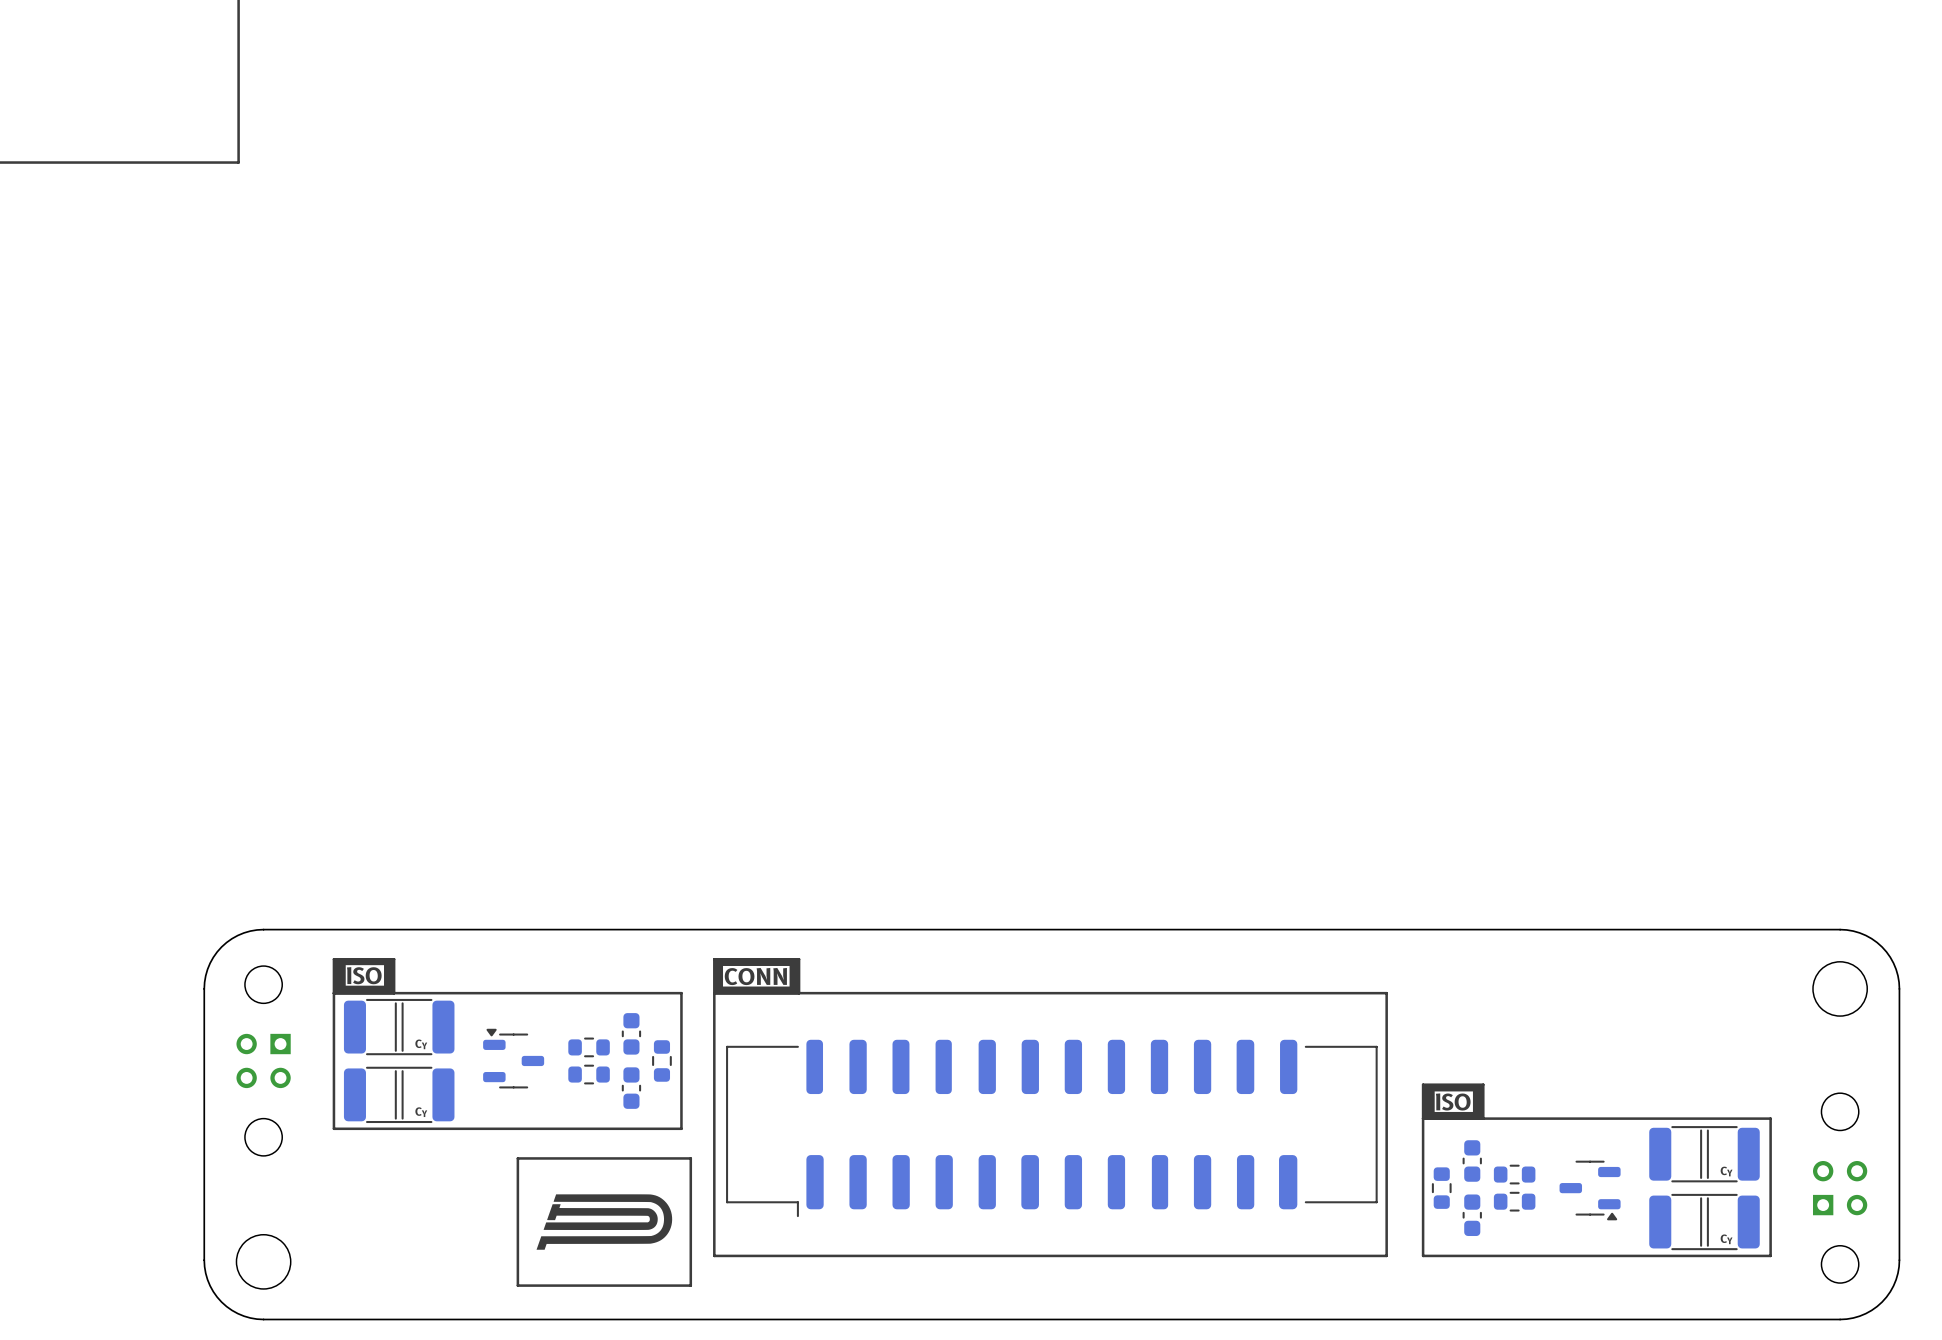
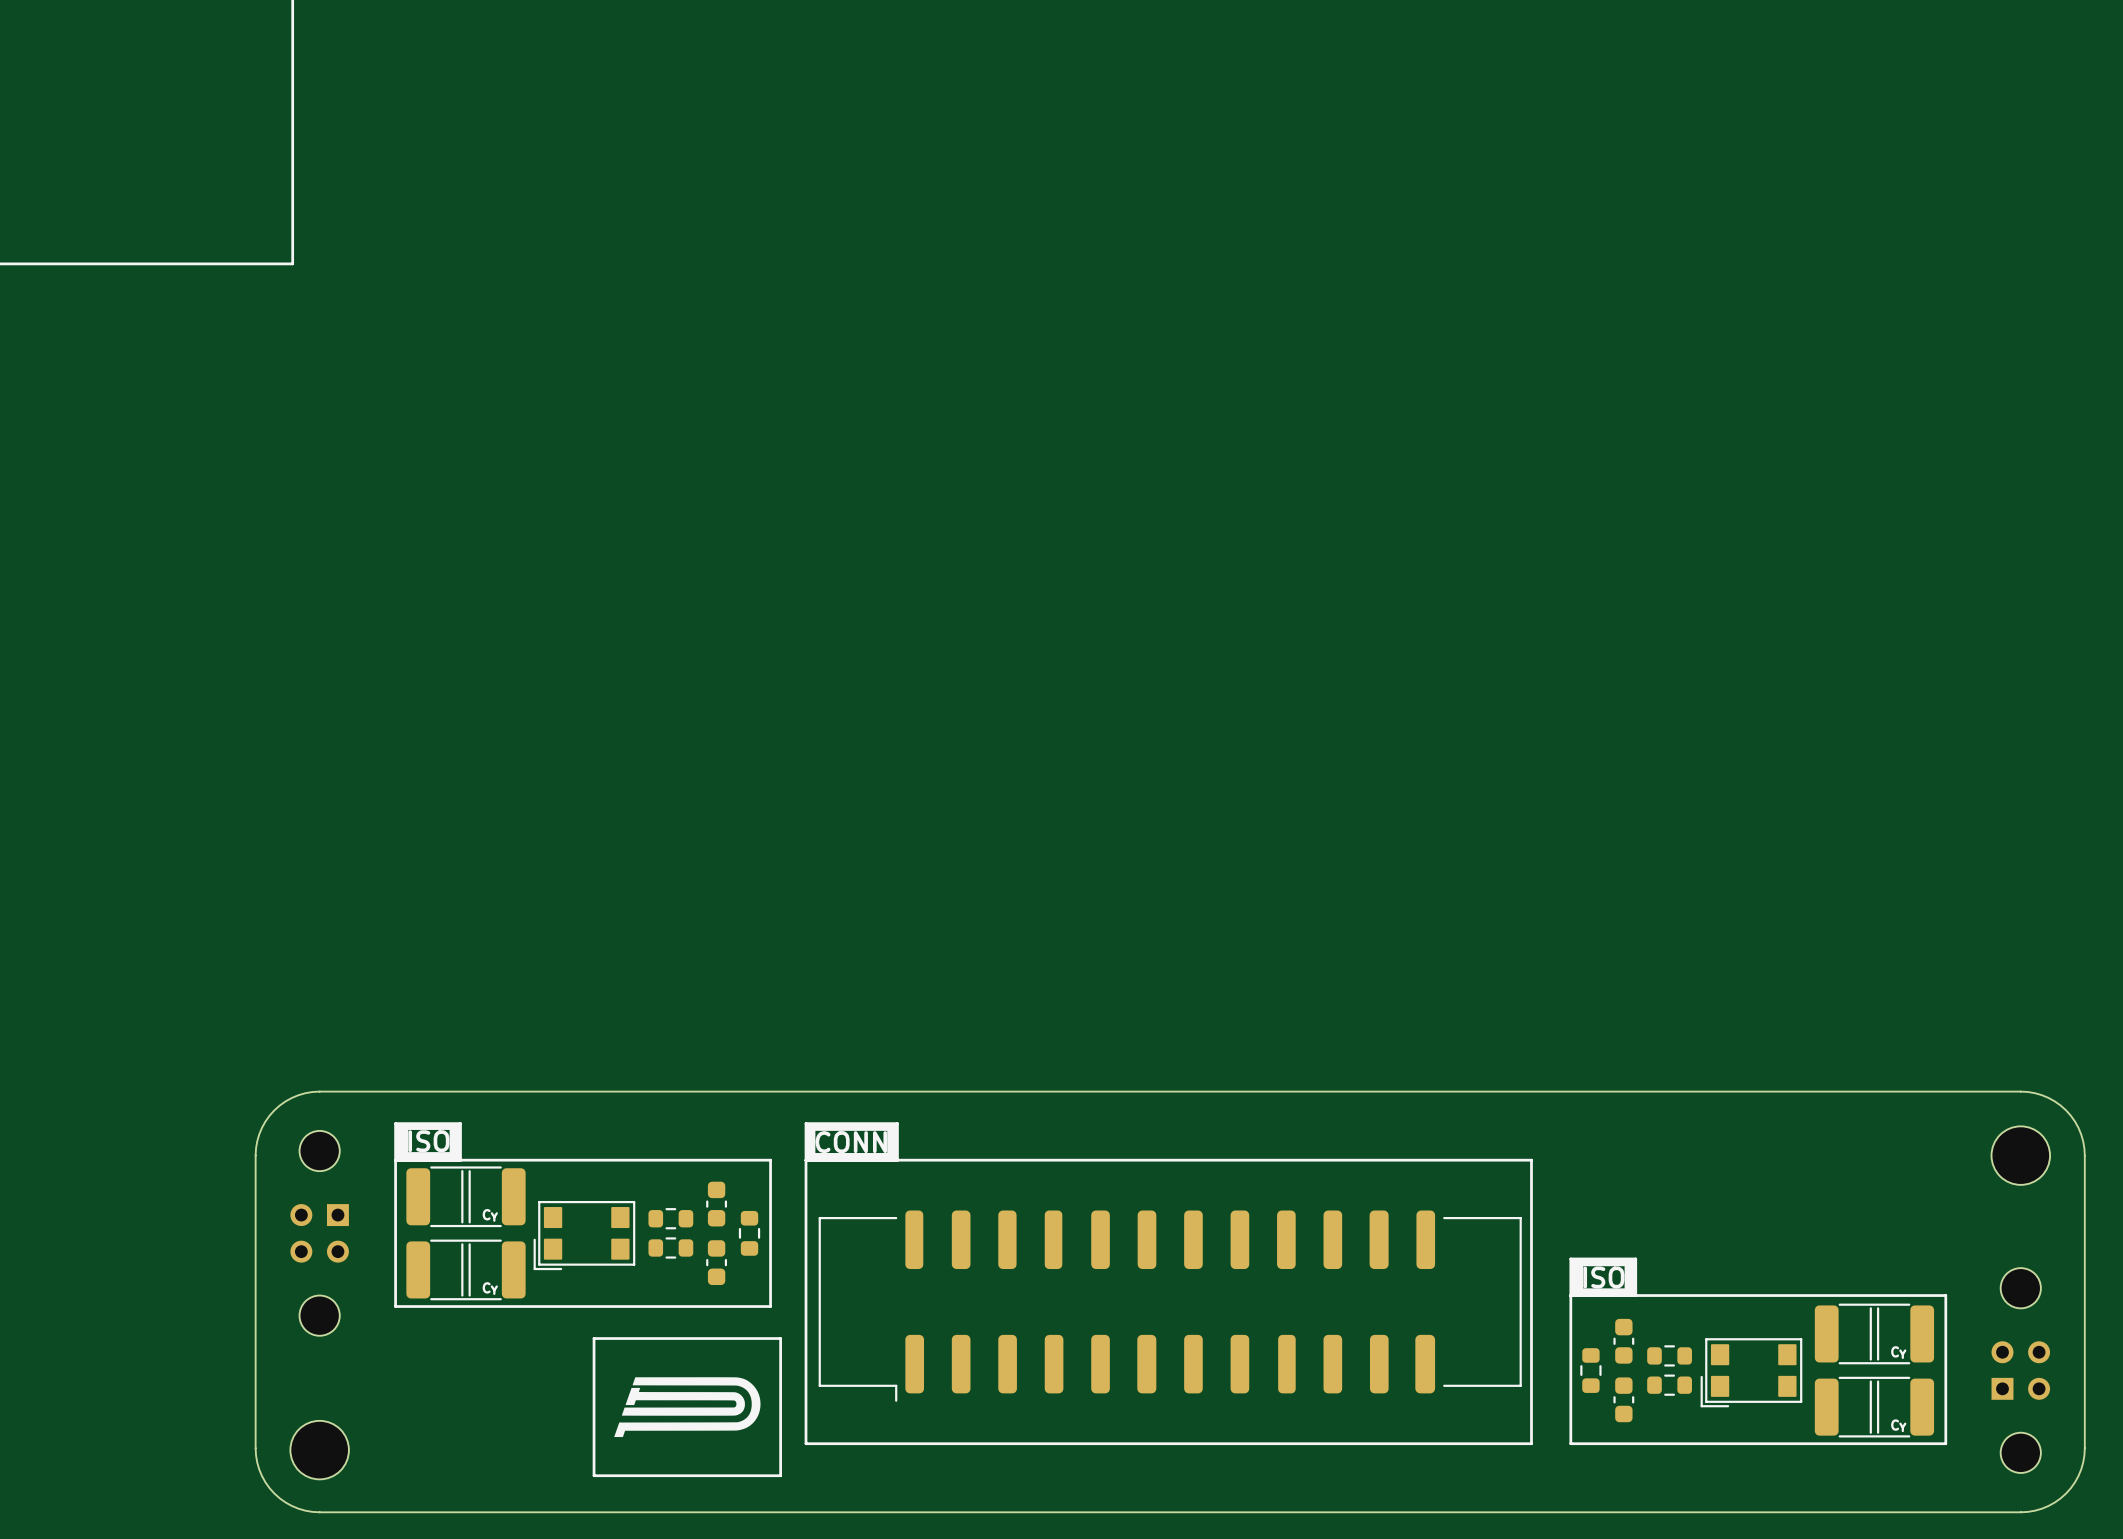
part footprint: [483, 1028, 545, 1089] -> [533, 1200, 636, 1271]
part footprint: [1559, 1160, 1621, 1221] -> [1700, 1338, 1803, 1408]

